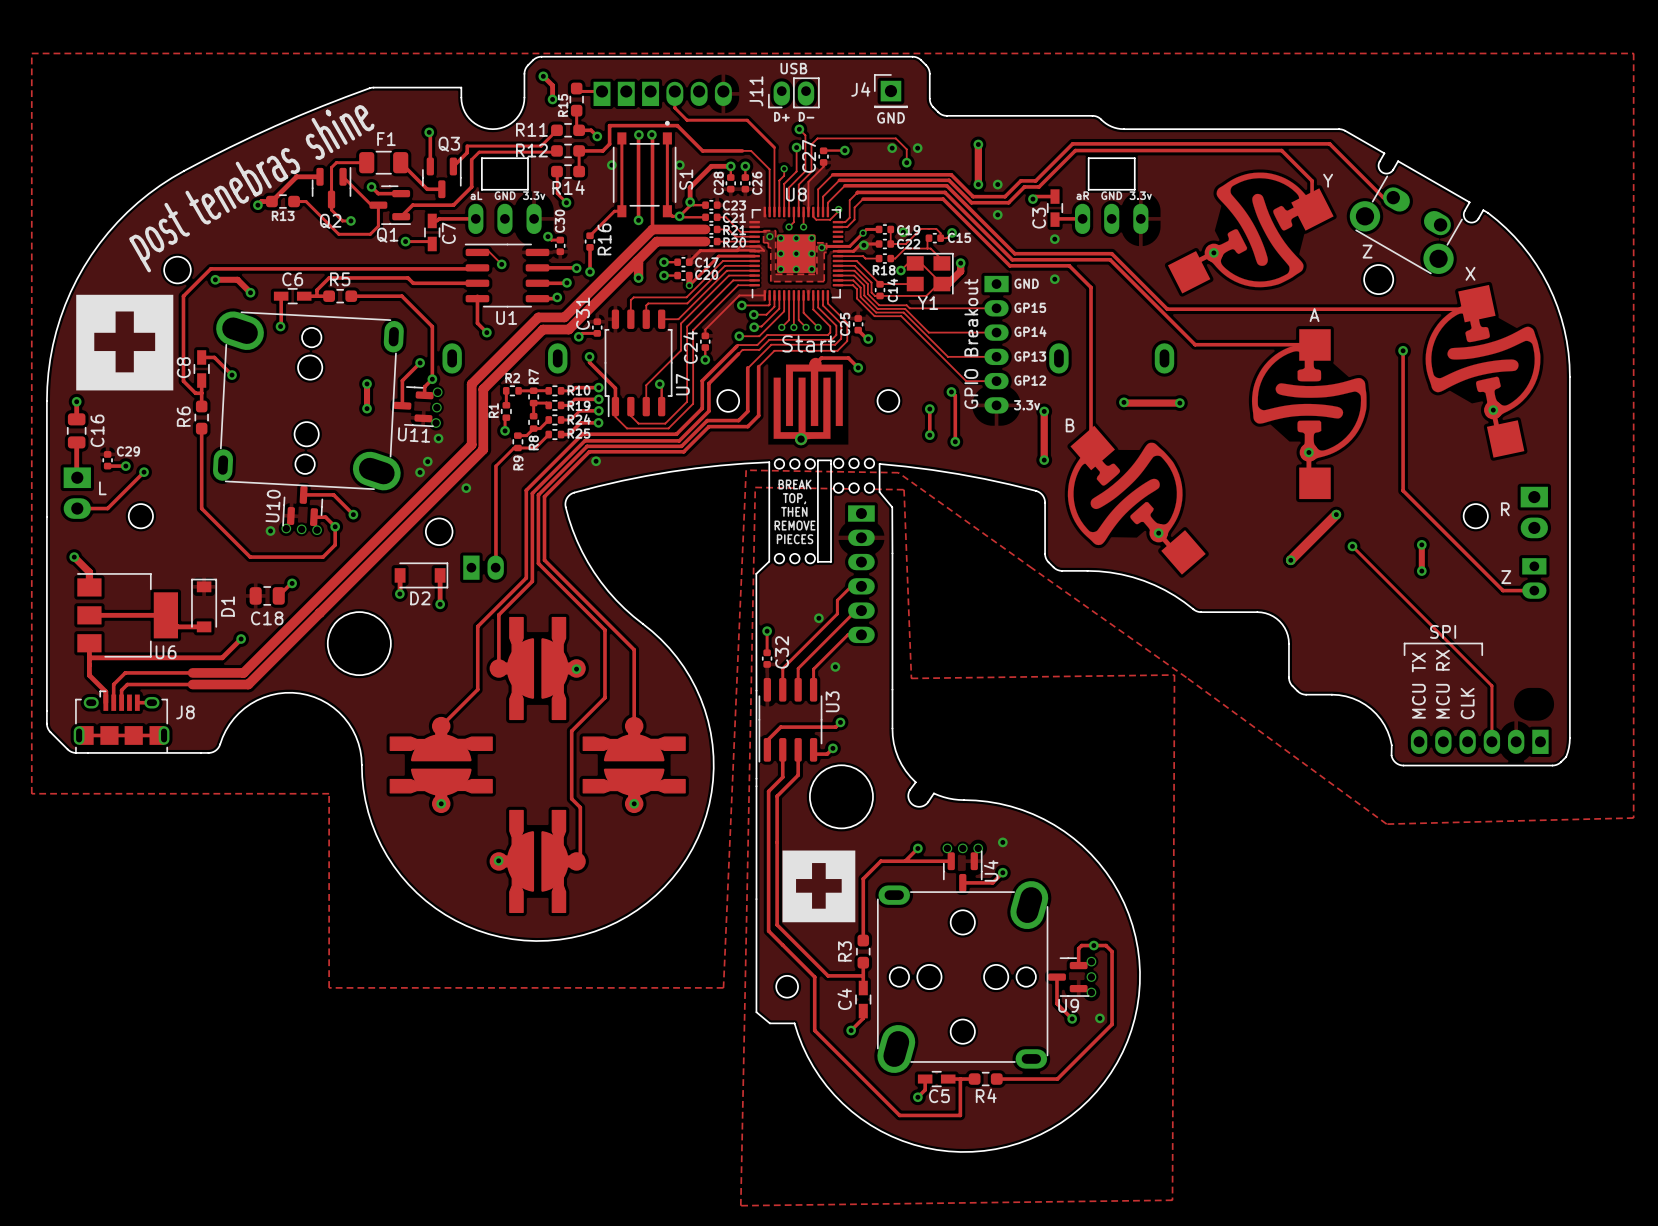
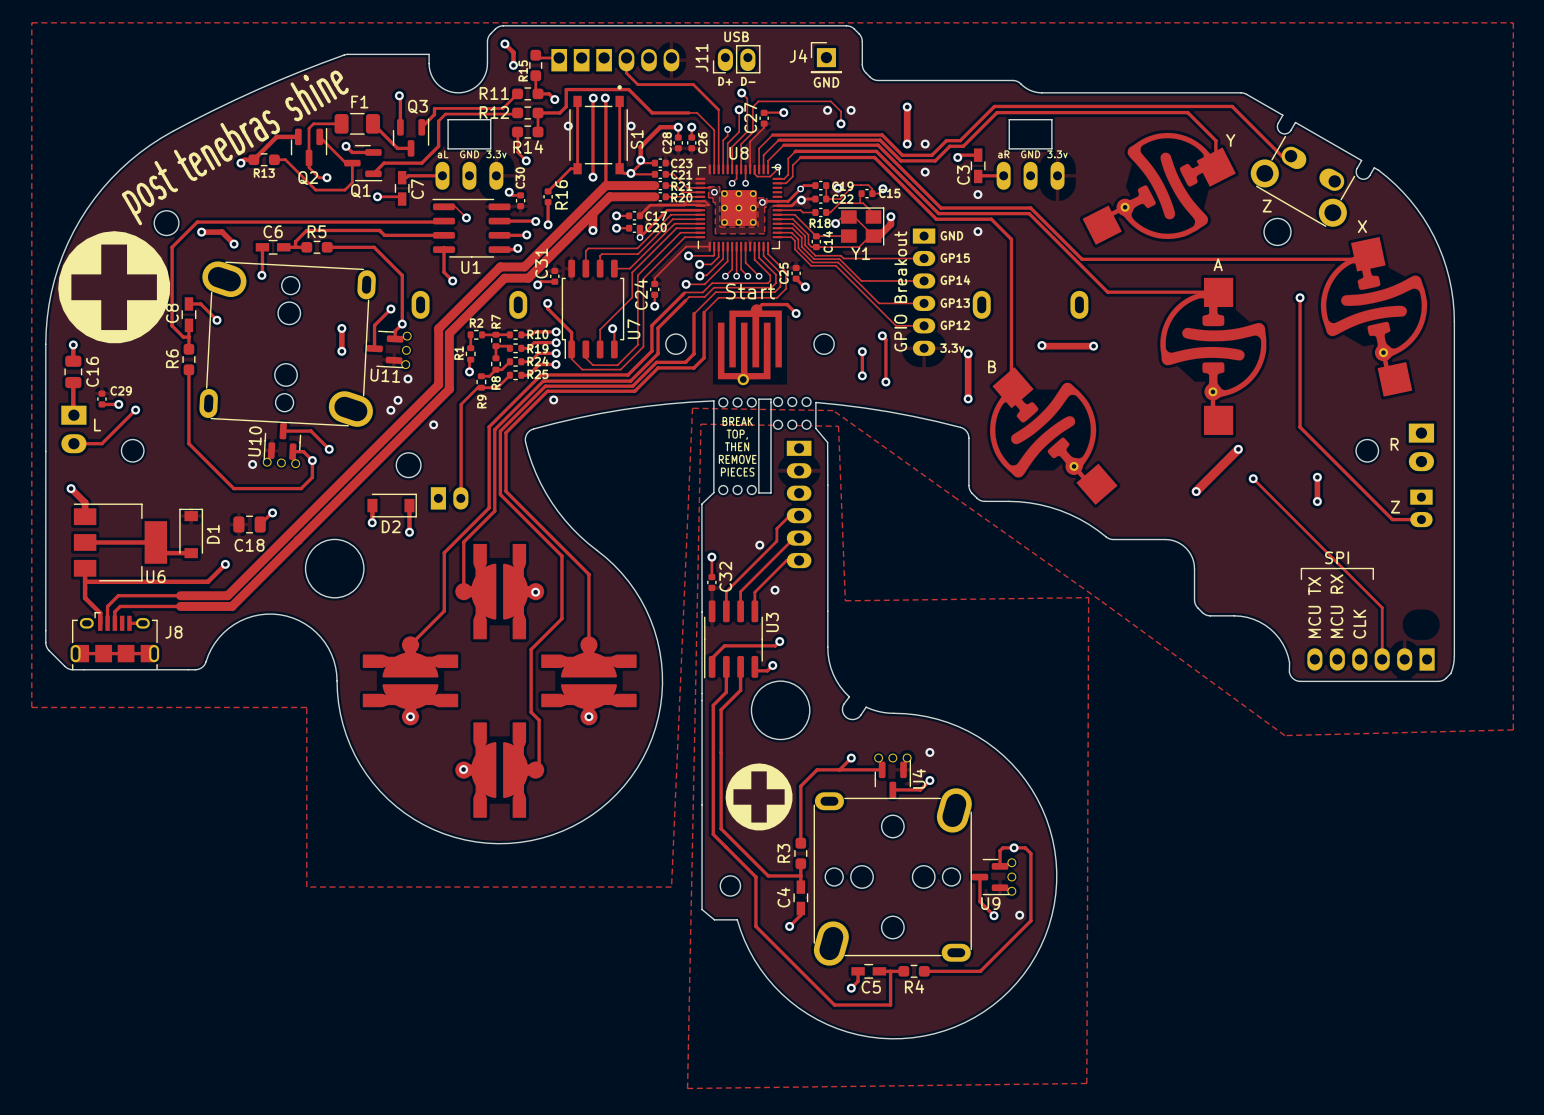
drawing shape: [76, 294, 174, 391] -> [58, 231, 171, 344]
drawing shape: [782, 850, 856, 923] -> [725, 763, 793, 831]

